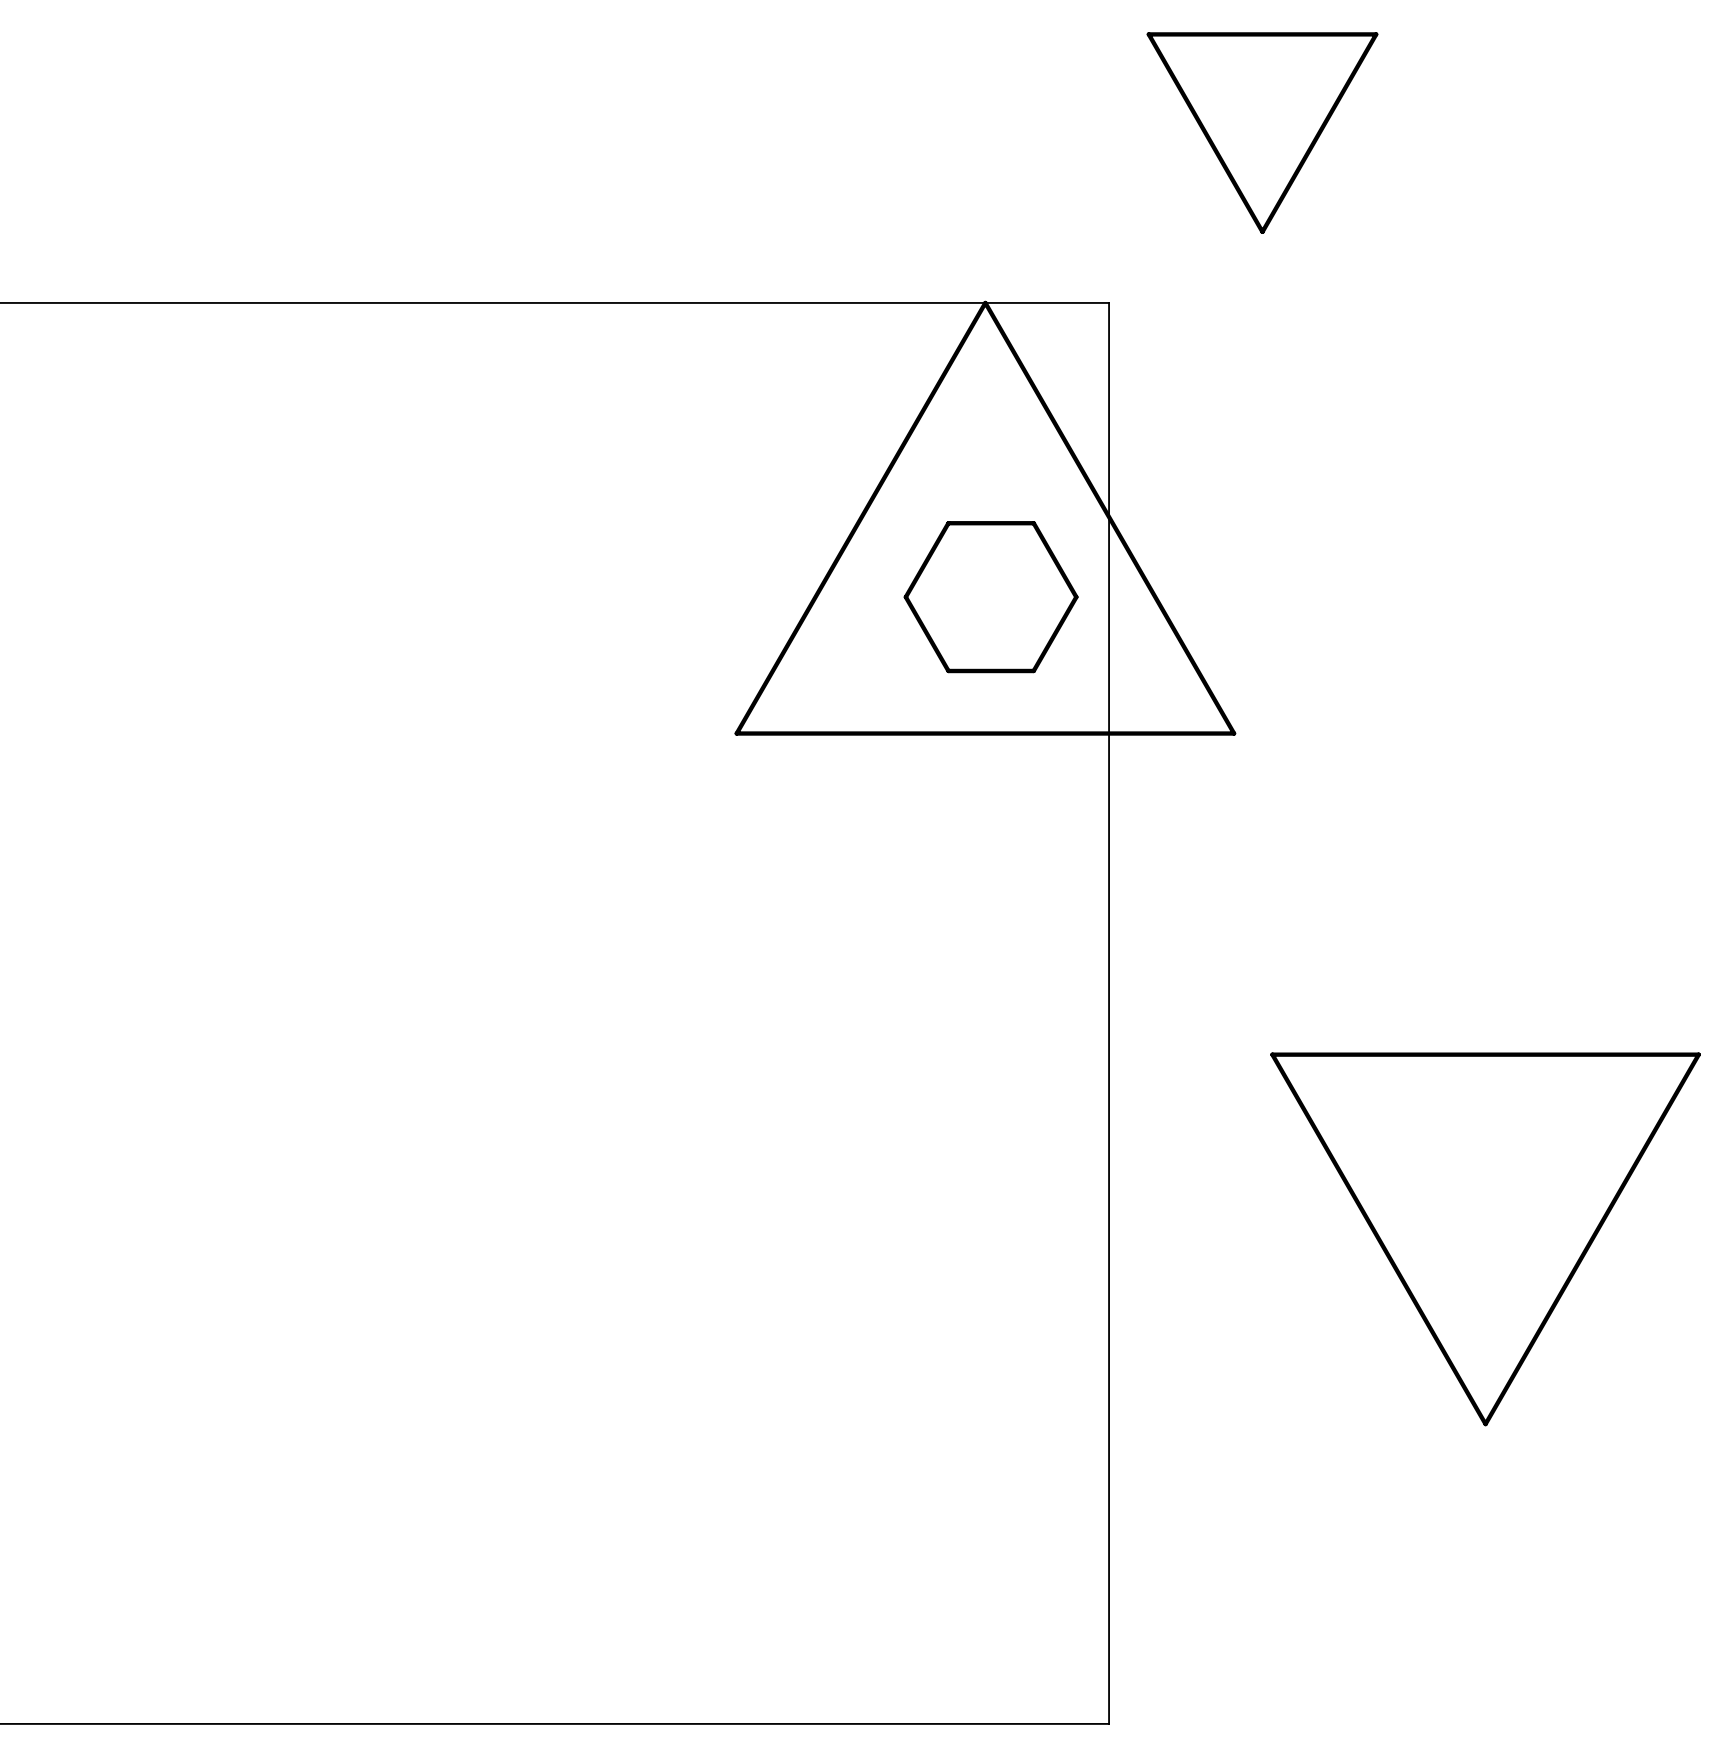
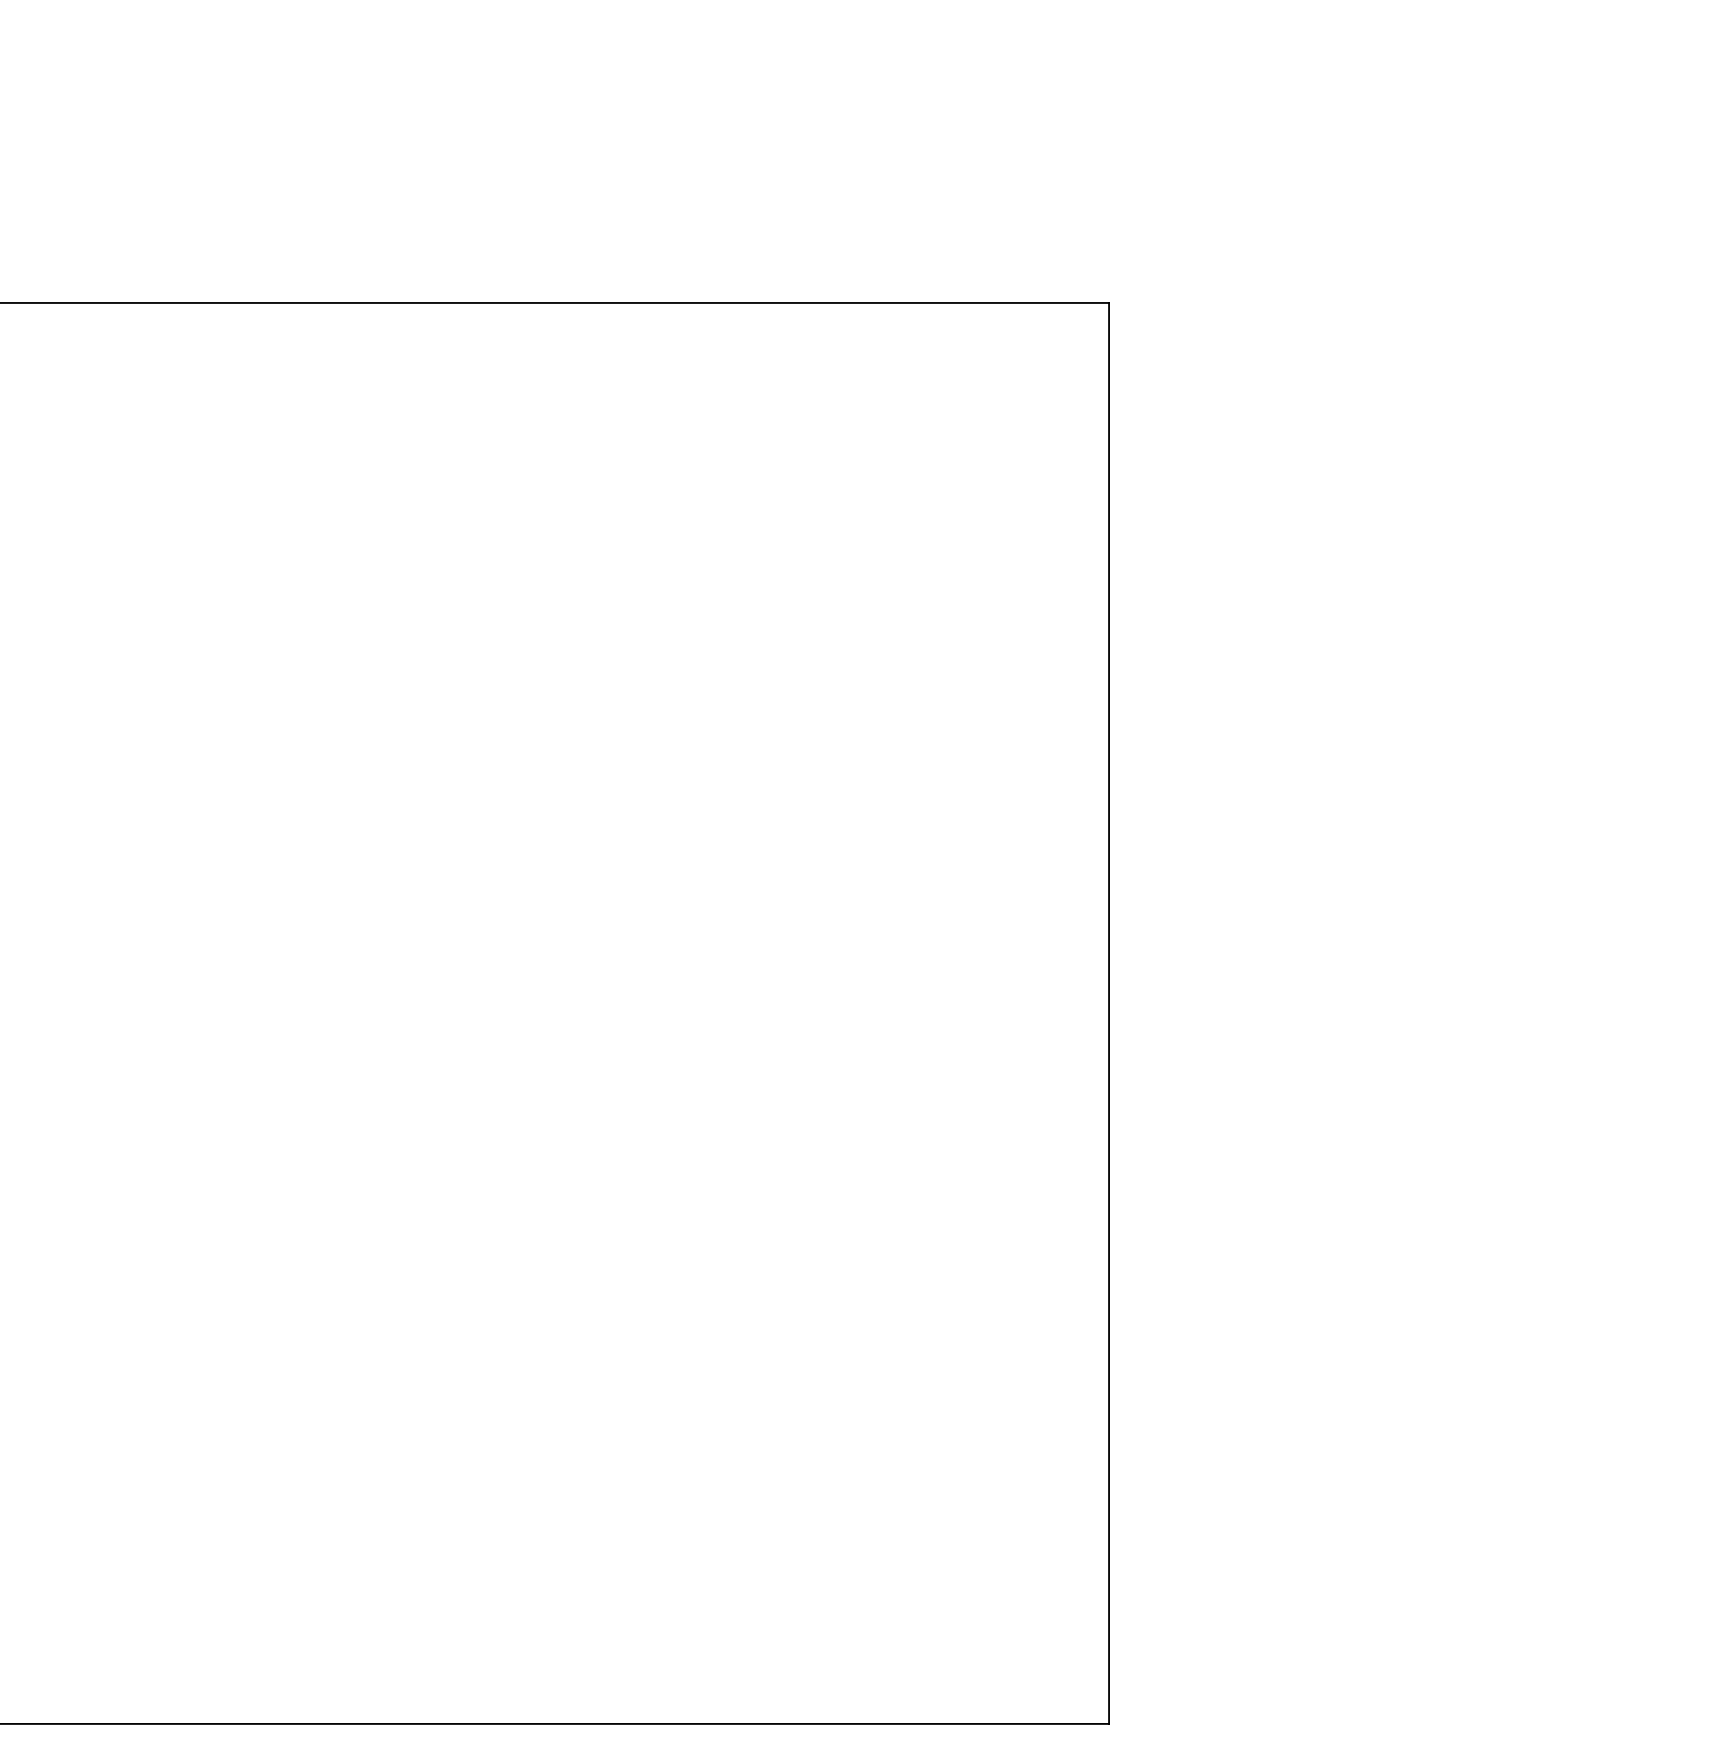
line: (1148, 34) (1376, 34) (1262, 231) (1148, 34) -> none
line: (985, 302) (1234, 733) (736, 733) (985, 302) -> none
line: (948, 523) (1033, 523) (1076, 597) (1033, 671) (948, 671) (905, 597) (948, 523) -> none
line: (1272, 1054) (1698, 1054) (1485, 1424) (1272, 1054) -> none

